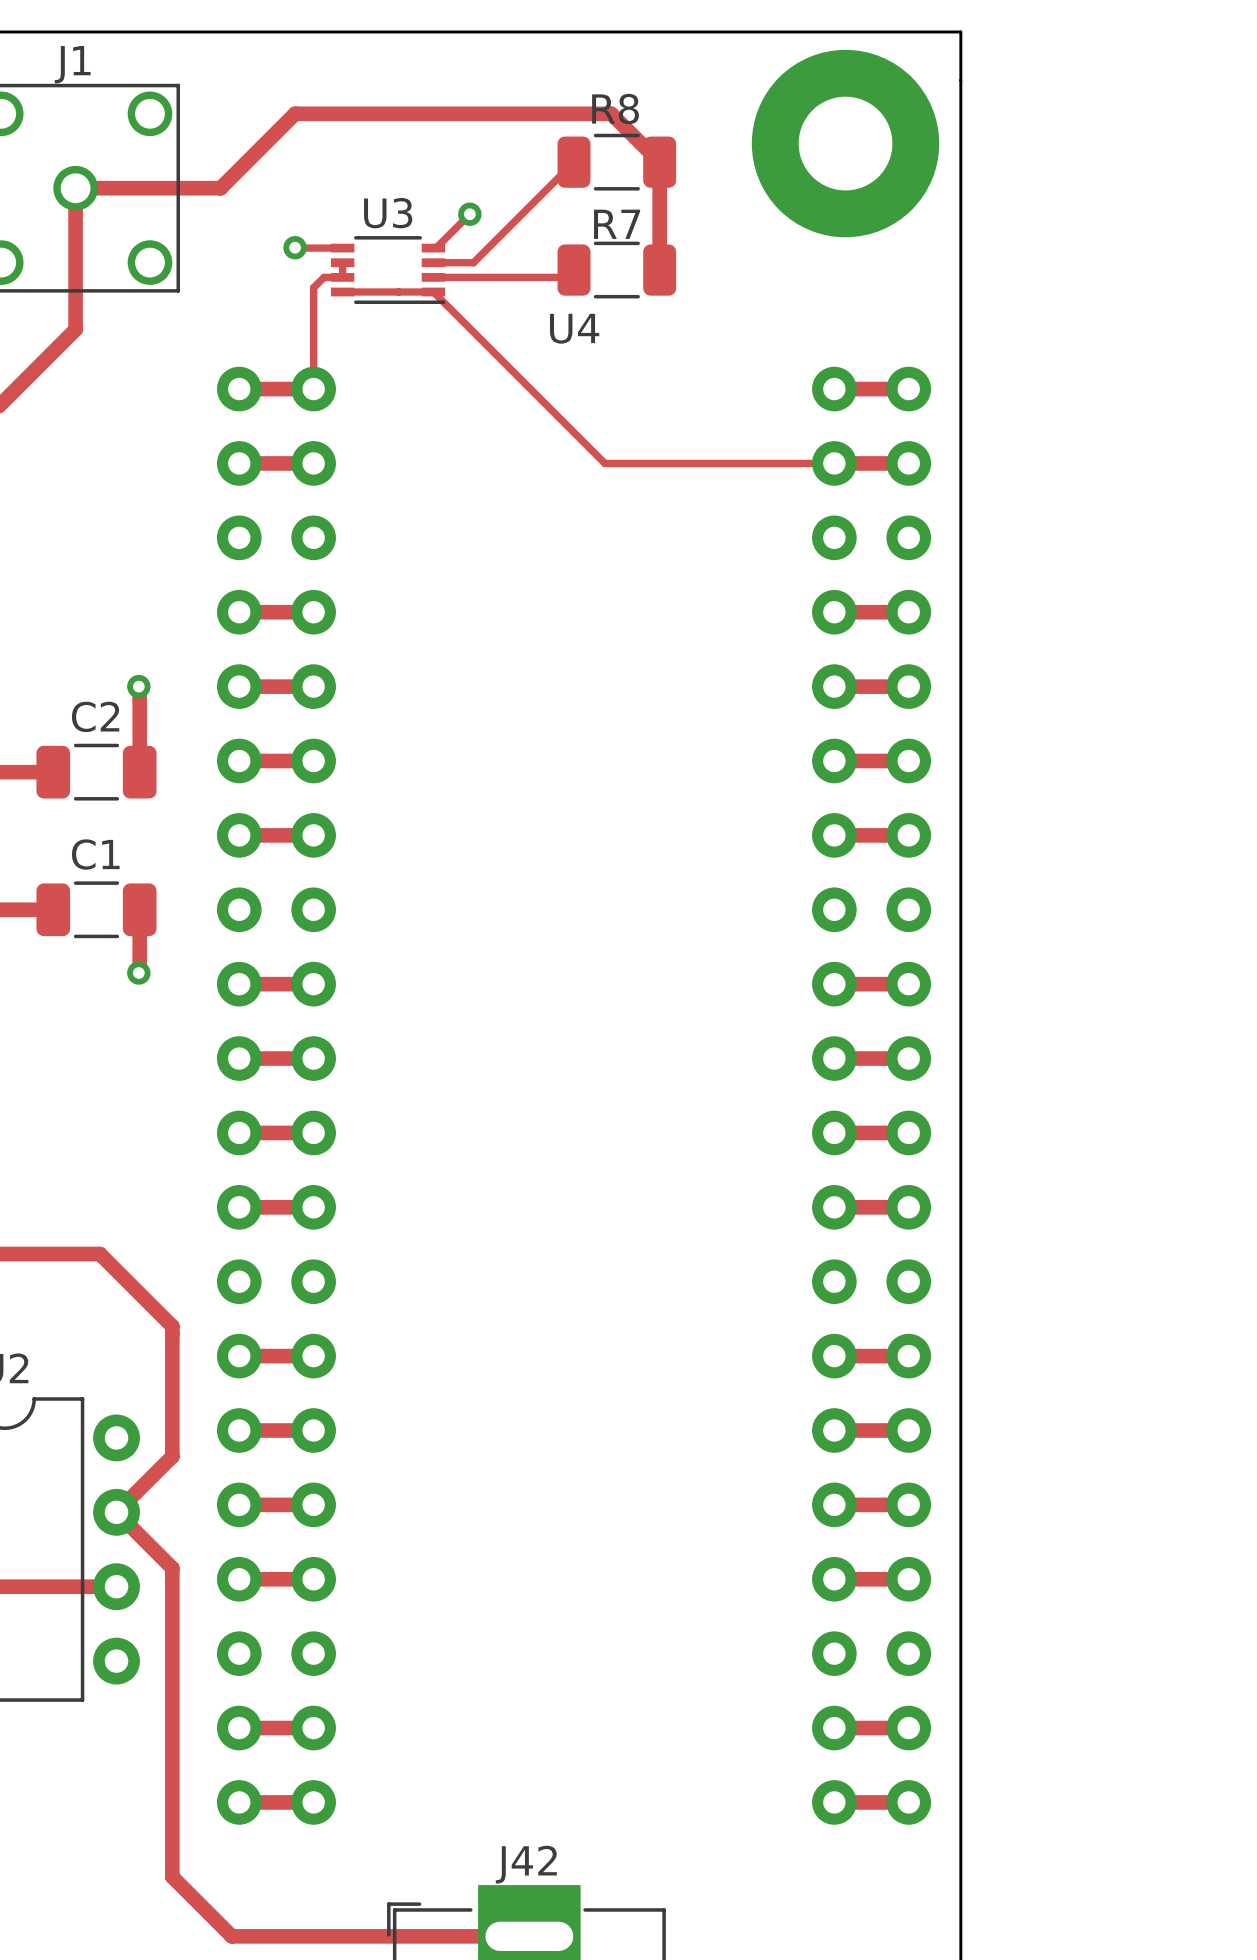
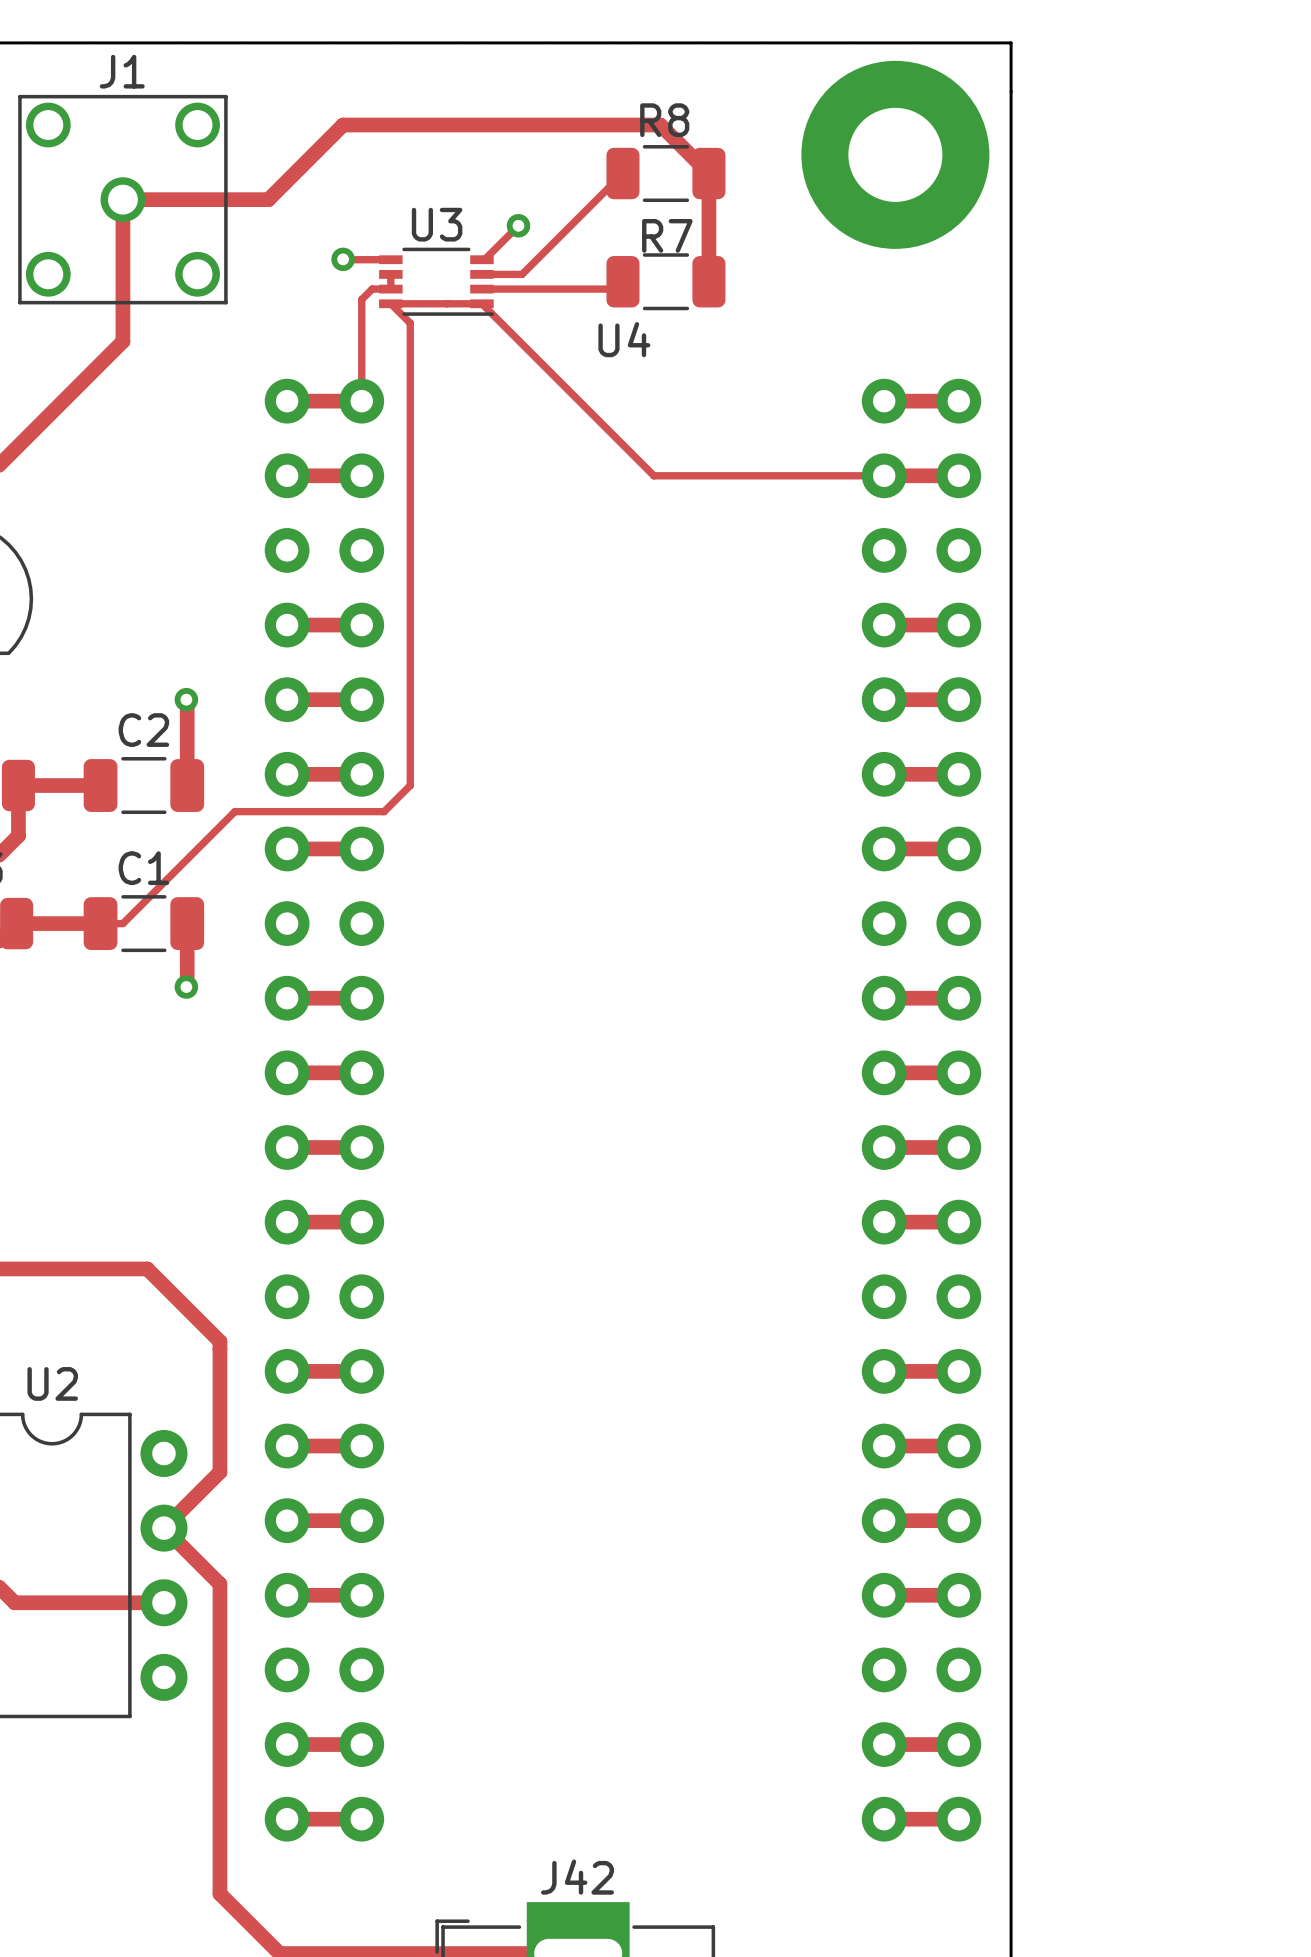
top track: none -> (390, 303) (410, 323) (410, 785) (384, 811) (234, 811) (122, 923) (100, 923)

